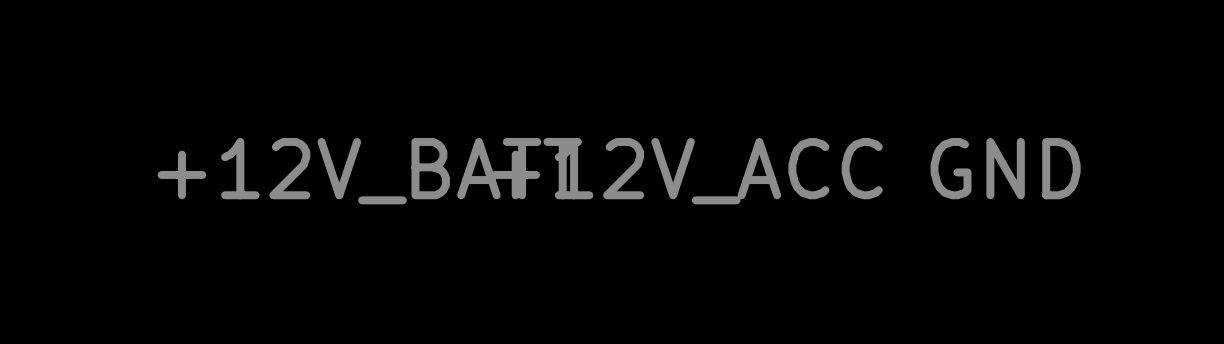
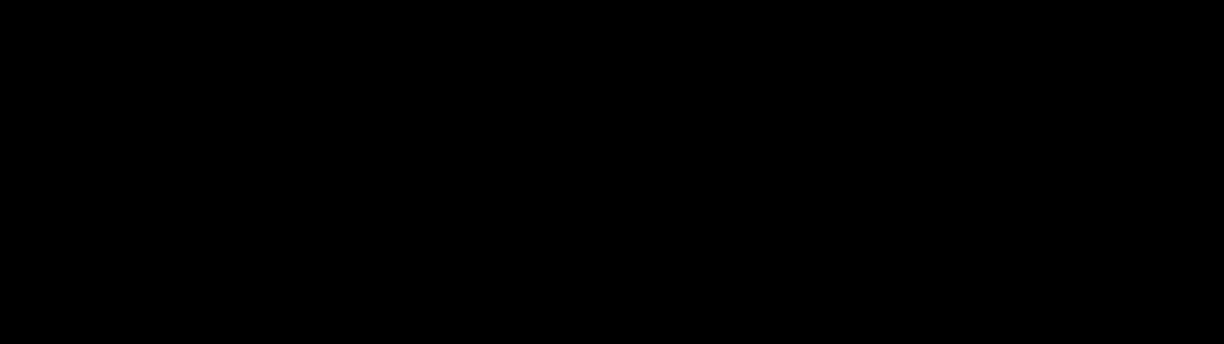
text: GND (1005, 168) -> none
text: +12V_BATT (369, 171) -> none
text: +12V_ACC (687, 171) -> none

